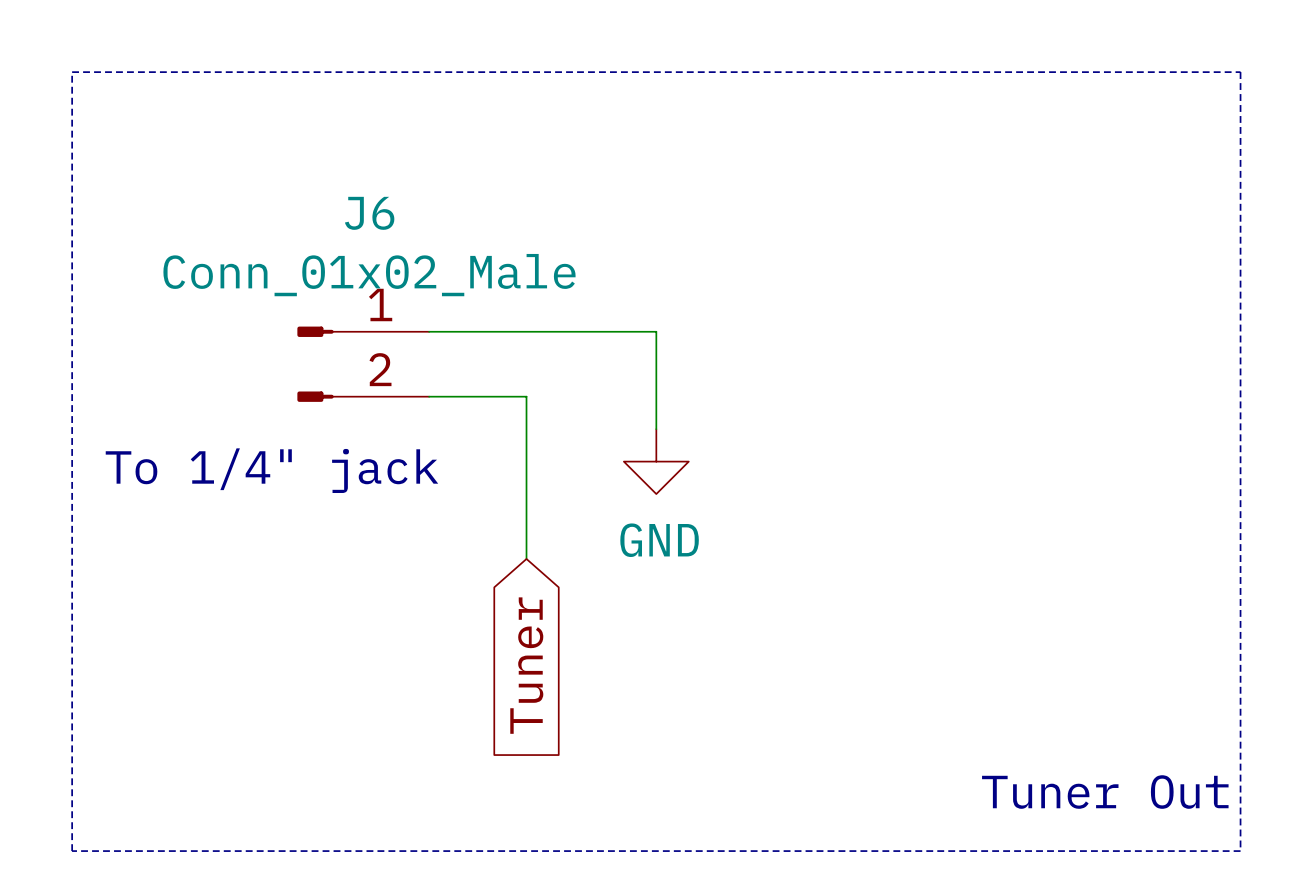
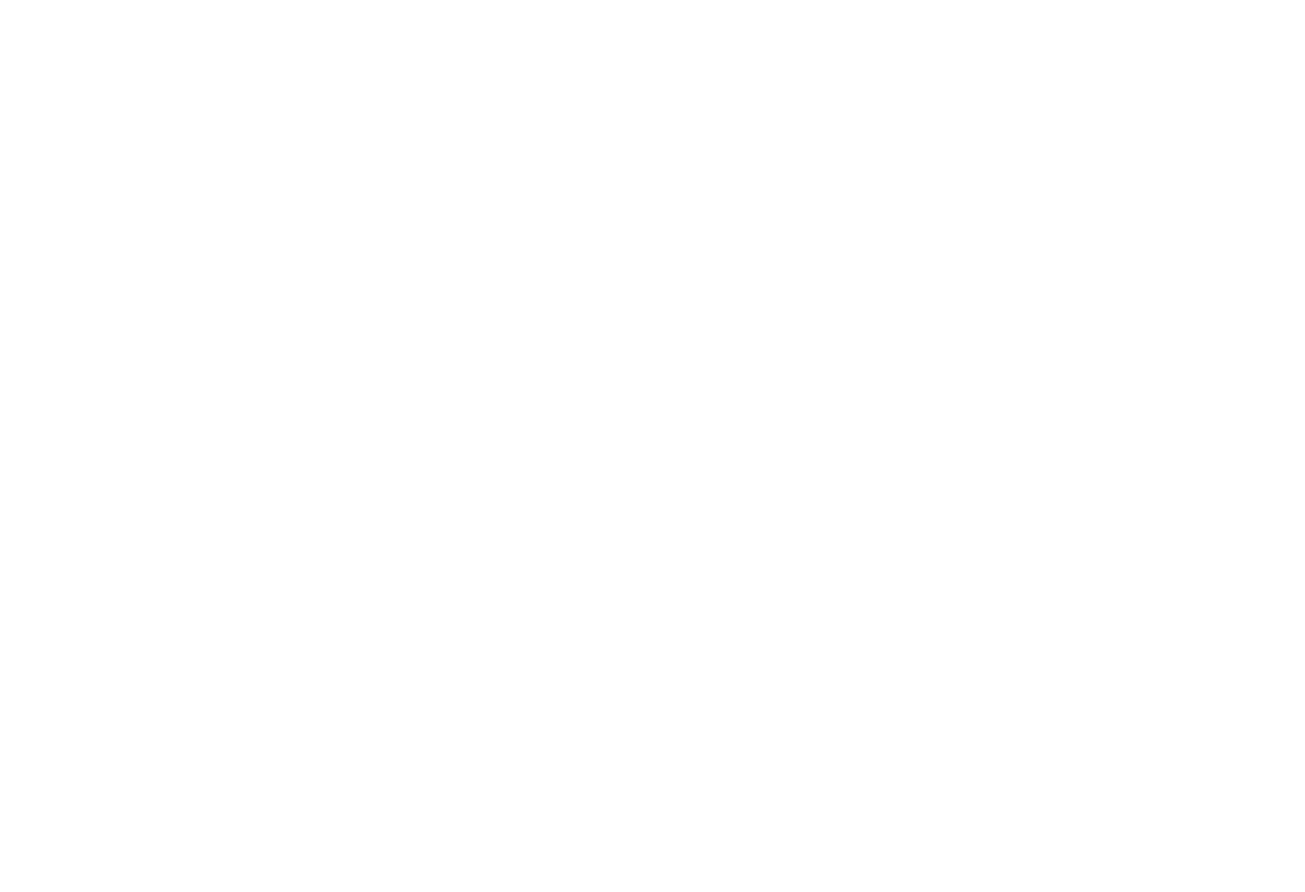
line: (72, 72) (72, 851) (1240, 851) (1240, 72) (72, 72) -> none
wire: (429, 331) (656, 331) (656, 429) -> none
J6: Conn_01x02_Male (363, 364) -> none
wire: (429, 396) (526, 396) (526, 558) -> none
power symbol: GND (656, 461) -> none
text: To 1/4" jack (271, 470) -> none
global label: Tuner (526, 665) -> none
text: Tuner Out (1105, 792) -> none

